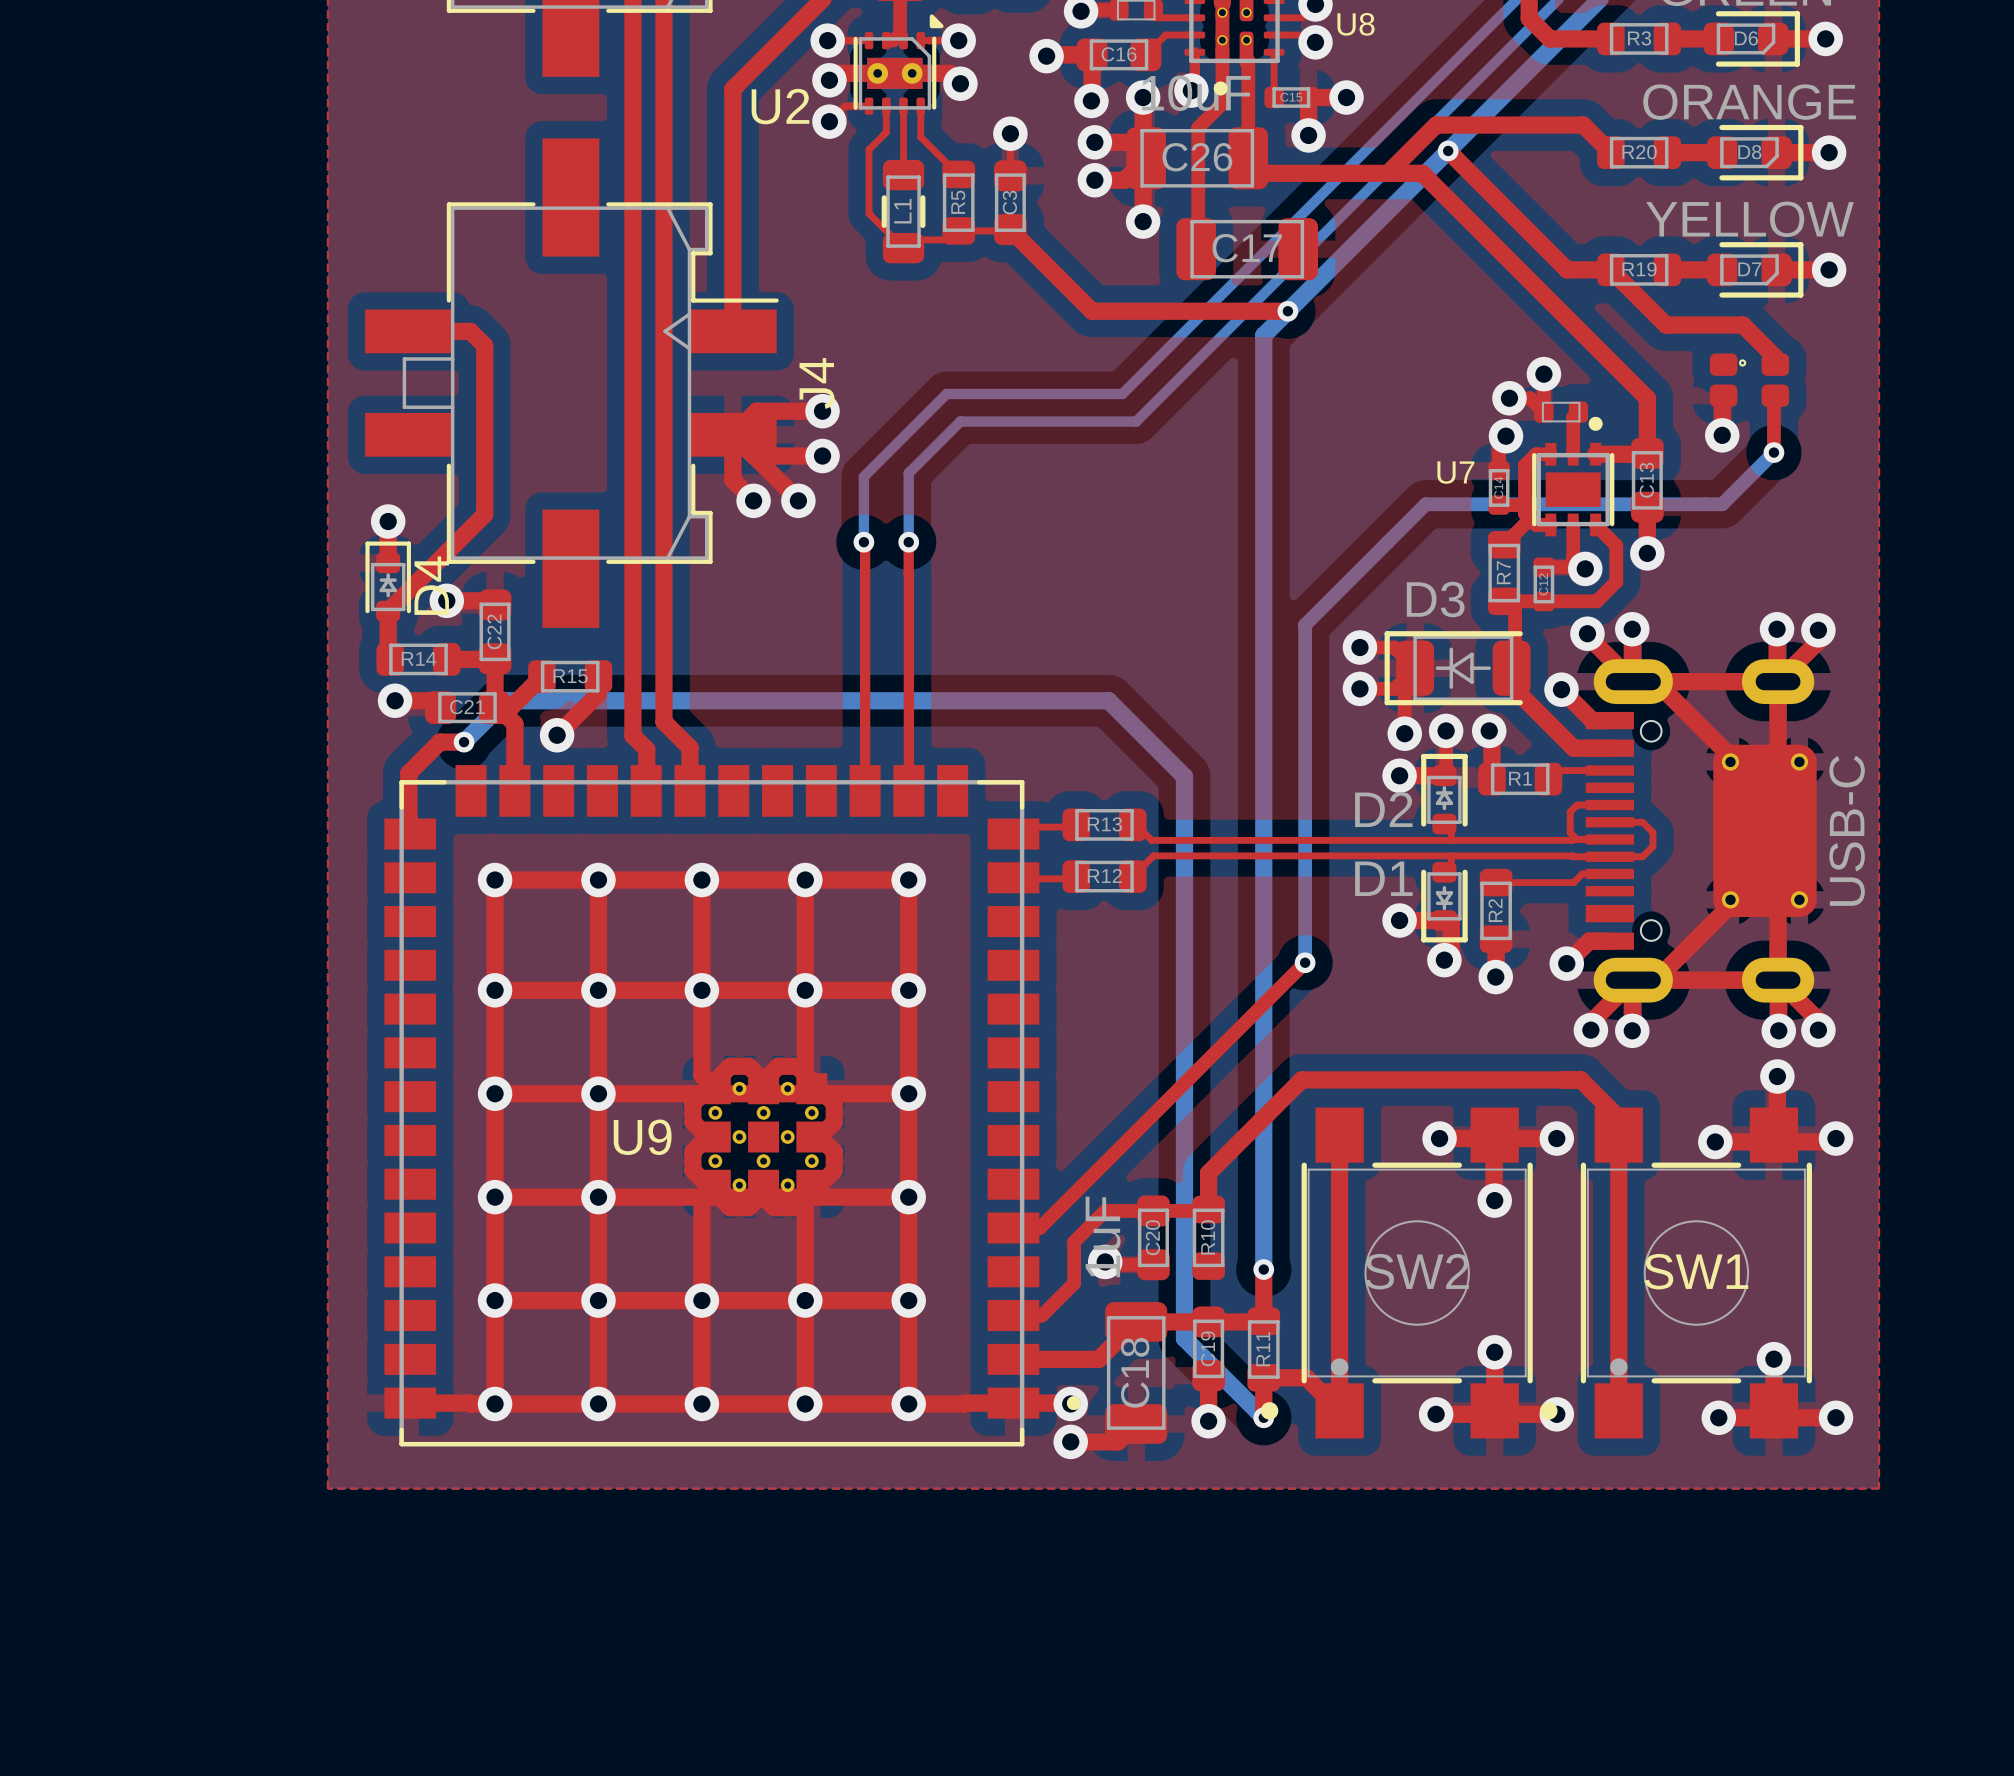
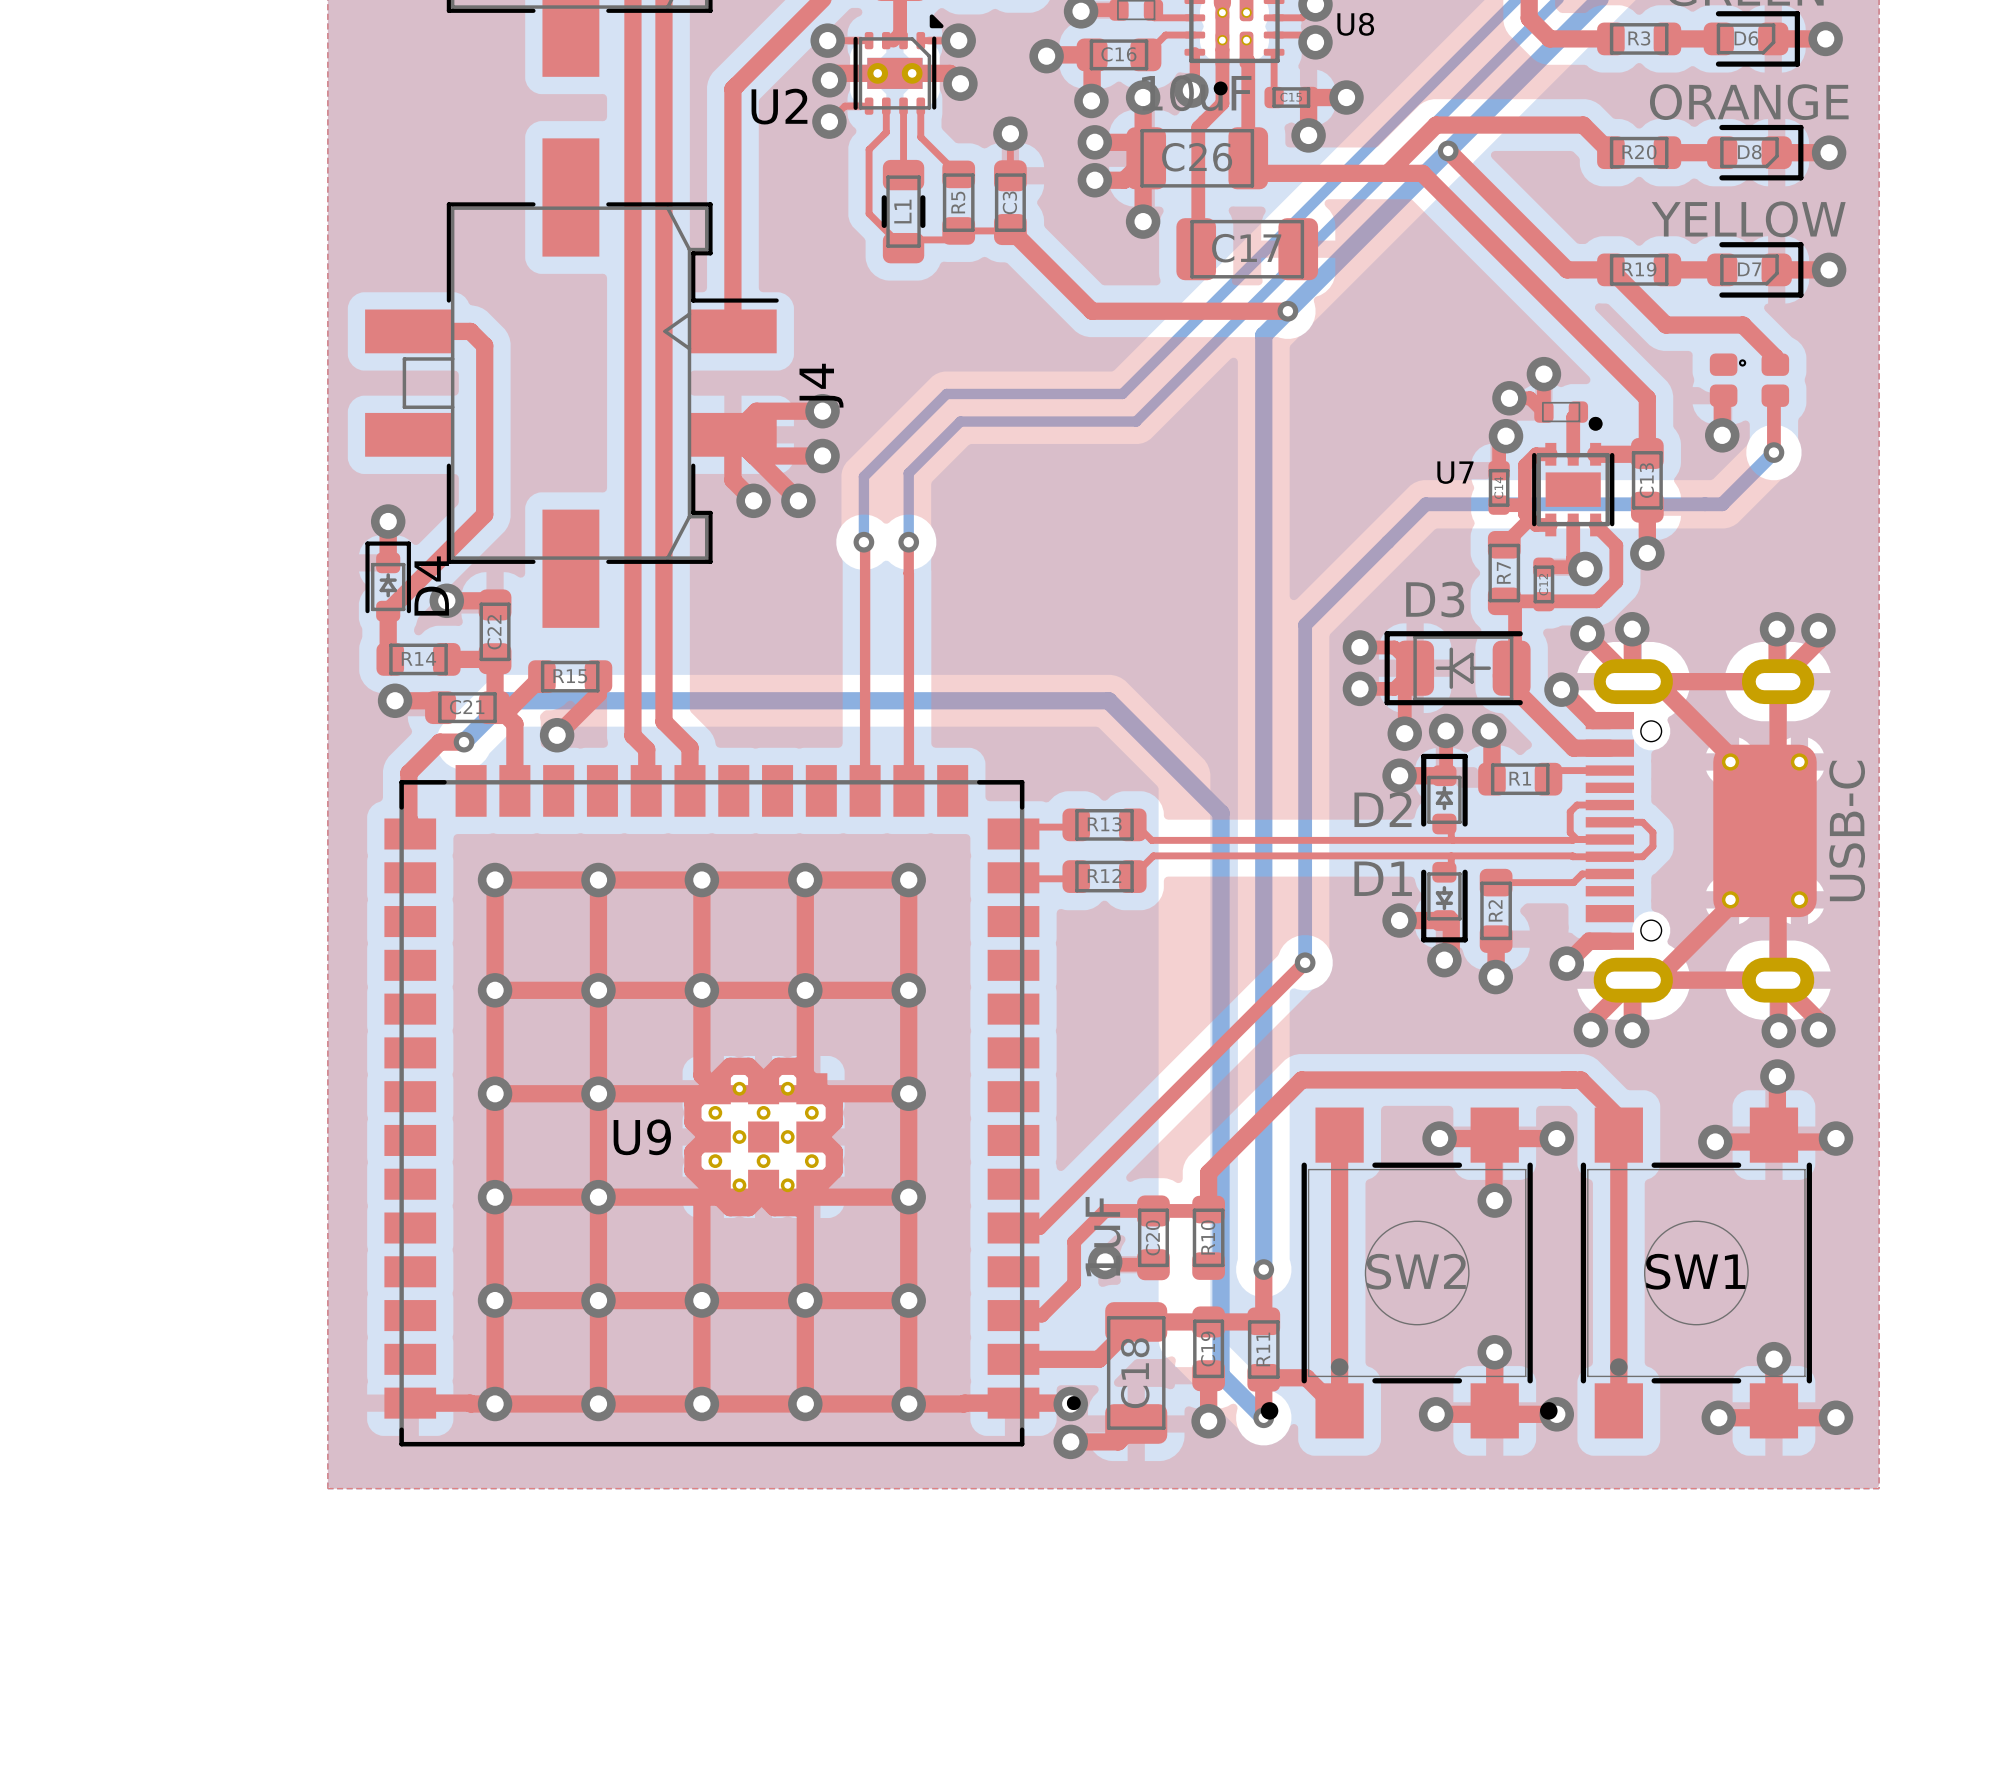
bottom track: (1184, 776) (1184, 1338) (1221, 1375) -> (1184, 776) (1221, 813) (1221, 1375)

